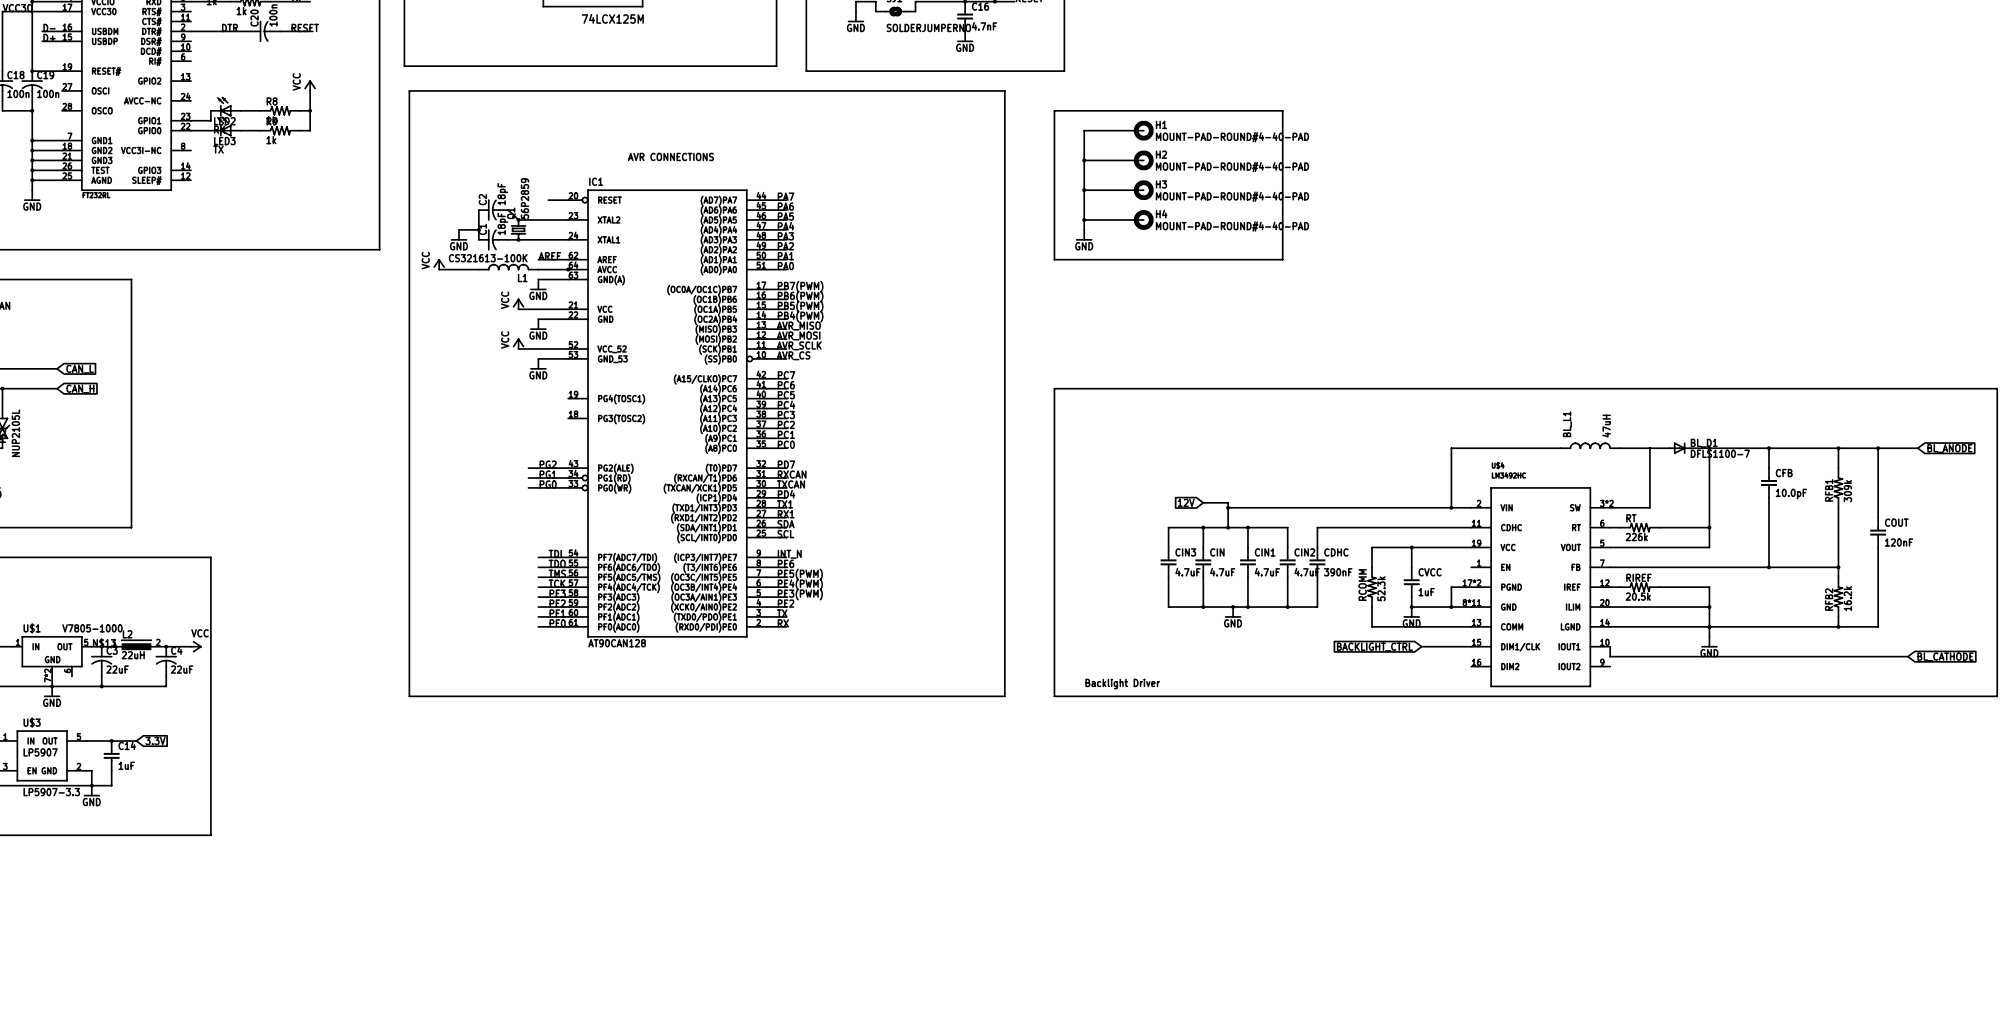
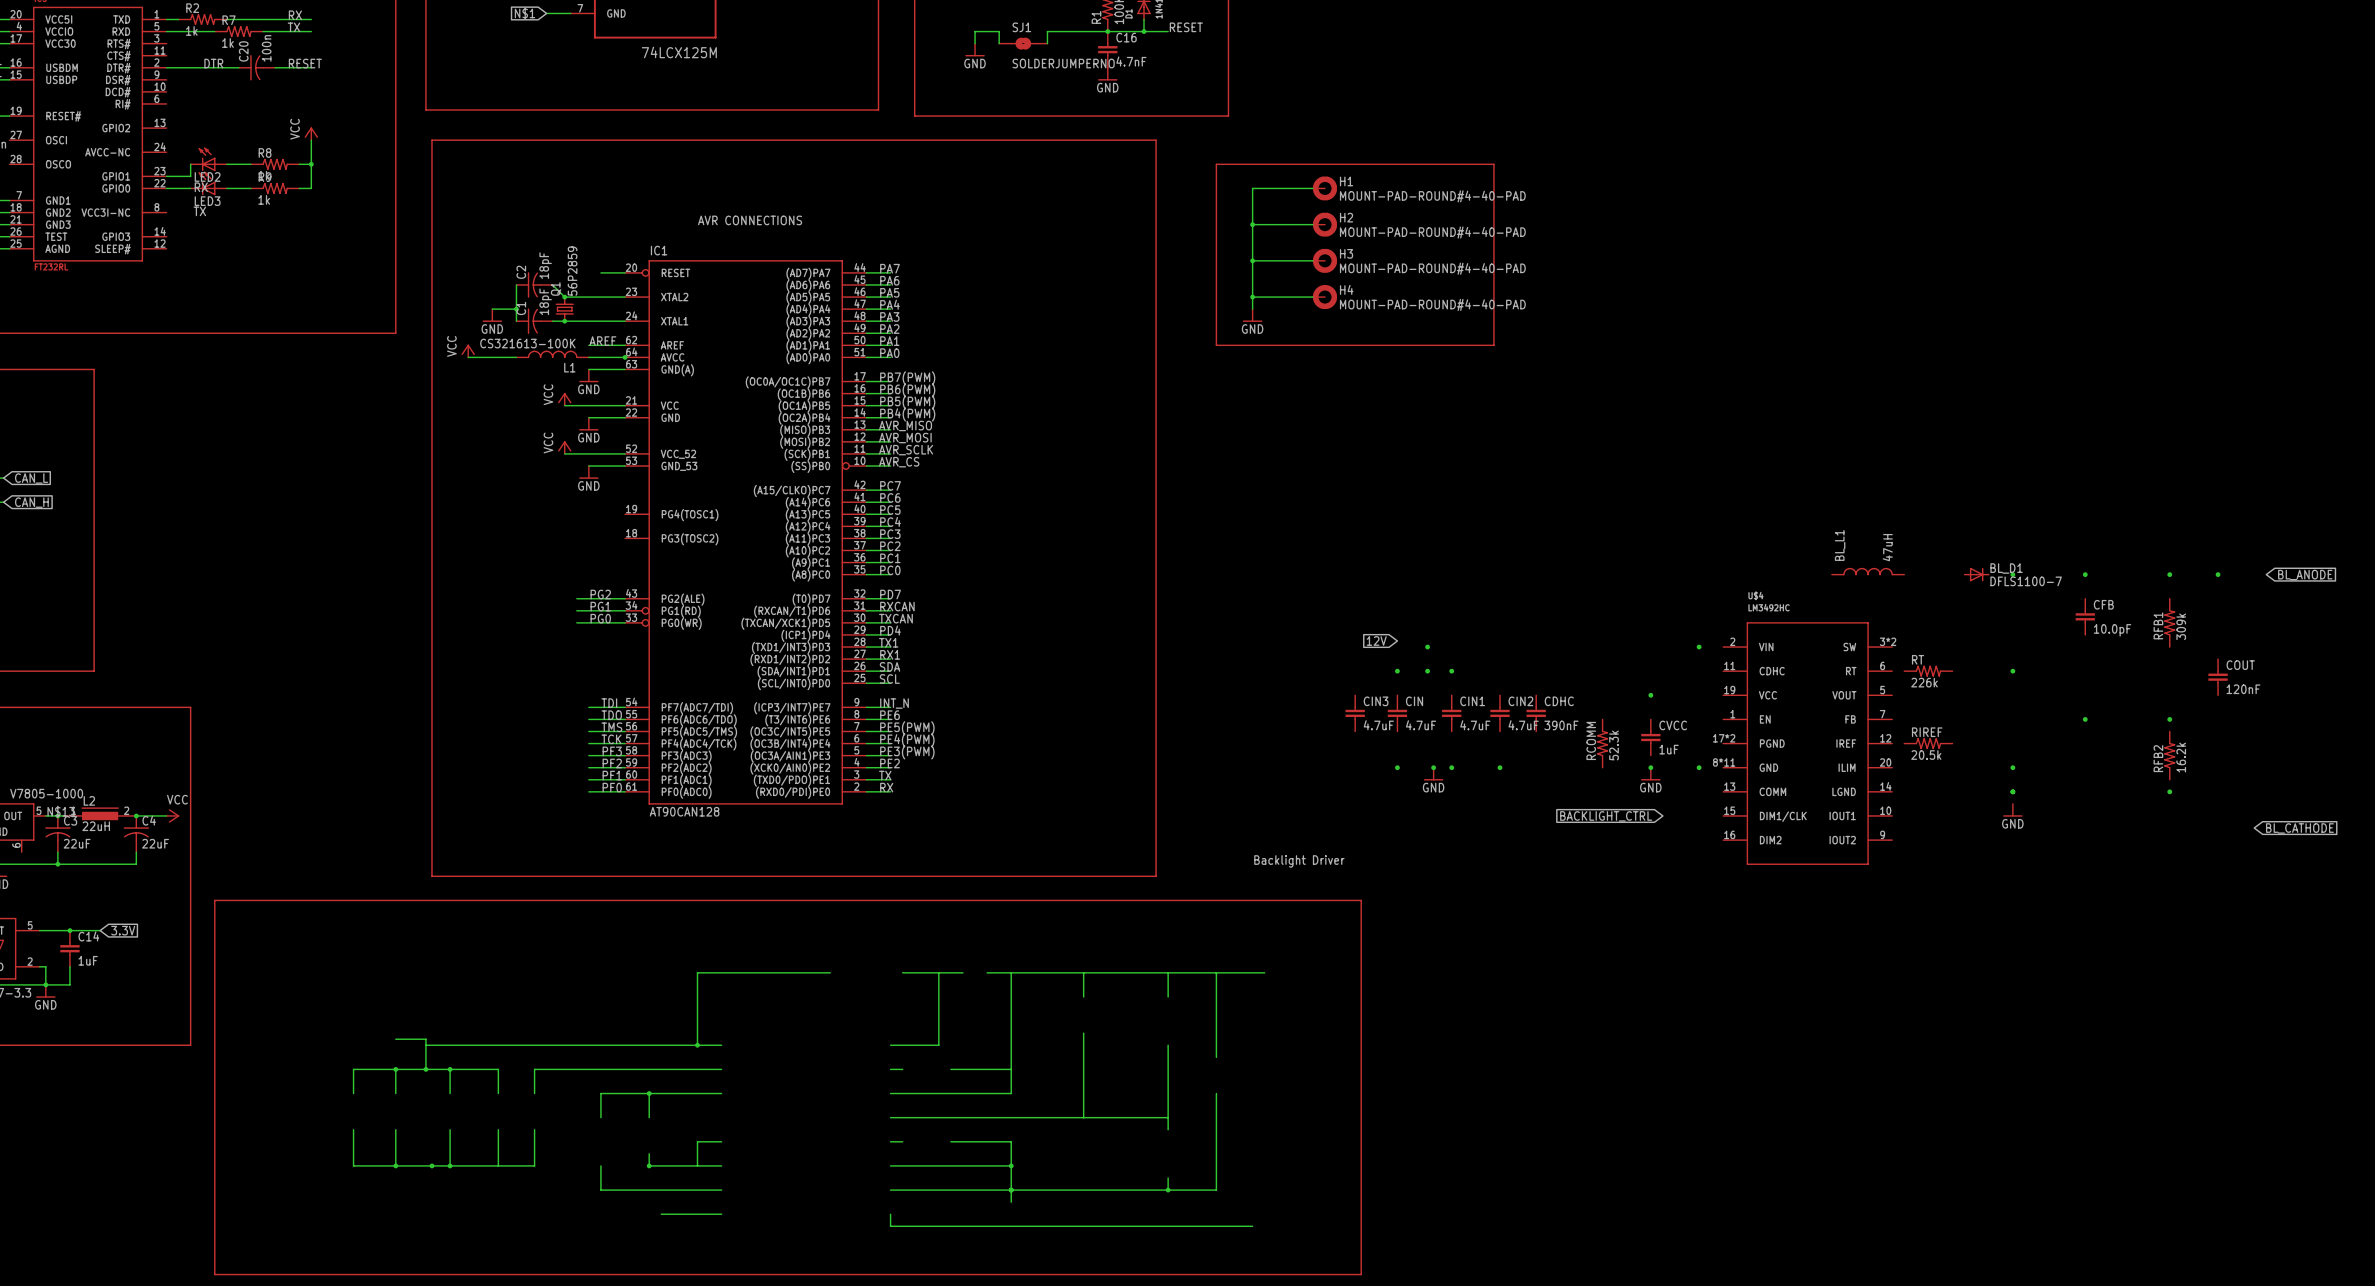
line: (1054, 388) (1997, 388) (1997, 696) (1054, 696) (1054, 388) -> none
wire: (1560, 448) (1451, 448) (1451, 507) -> none
wire: (1620, 448) (1669, 448) -> none
wire: (1649, 448) (1649, 507) (1610, 507) -> none
wire: (1689, 448) (1917, 448) -> none
wire: (1709, 448) (1709, 547) (1610, 547) -> none
wire: (1768, 448) (1768, 468) -> none
wire: (1838, 448) (1838, 468) -> none
wire: (1878, 448) (1878, 517) -> none
wire: (1768, 497) (1768, 567) -> none
wire: (1203, 502) (1228, 502) (1228, 527) -> none
wire: (1228, 507) (1471, 507) -> none
wire: (1838, 507) (1838, 577) -> none
wire: (1203, 527) (1203, 547) -> none
wire: (1247, 527) (1247, 547) -> none
wire: (1471, 527) (1317, 527) (1317, 547) -> none
wire: (1610, 527) (1620, 527) -> none
wire: (1659, 527) (1709, 527) -> none
wire: (1168, 547) (1168, 527) (1287, 527) (1287, 547) -> none
wire: (1411, 547) (1411, 567) -> none
wire: (1471, 547) (1372, 547) (1372, 567) -> none
wire: (1878, 547) (1878, 626) (1610, 626) -> none
wire: (1610, 567) (1838, 567) -> none
wire: (1168, 577) (1168, 607) (1317, 607) (1317, 577) -> none
wire: (1203, 577) (1203, 607) -> none
wire: (1247, 577) (1247, 607) -> none
wire: (1287, 577) (1287, 607) -> none
wire: (1471, 587) (1451, 587) (1451, 607) -> none
wire: (1610, 587) (1620, 587) -> none
wire: (1659, 587) (1709, 587) (1709, 636) -> none
wire: (1411, 597) (1411, 607) (1471, 607) -> none
wire: (1372, 607) (1372, 626) (1471, 626) -> none
wire: (1610, 607) (1709, 607) -> none
wire: (1838, 616) (1838, 626) -> none
wire: (1421, 646) (1471, 646) -> none
wire: (1610, 646) (1610, 656) (1907, 656) -> none
line: none -> (214, 900) (1361, 900) (1361, 1274) (214, 1274) (214, 900)
wire: none -> (830, 972) (697, 972) (697, 1045)
wire: none -> (902, 972) (962, 972)
wire: none -> (938, 972) (938, 1045) (890, 1045)
wire: none -> (987, 972) (1264, 972)
wire: none -> (1011, 972) (1011, 1093) (890, 1093)
wire: none -> (1083, 972) (1083, 996)
wire: none -> (1168, 972) (1168, 996)
wire: none -> (1216, 972) (1216, 1057)
wire: none -> (1083, 1033) (1083, 1117)
wire: none -> (395, 1039) (425, 1039) (425, 1069)
wire: none -> (425, 1045) (721, 1045)
junction: none -> (697, 1045)
wire: none -> (1168, 1045) (1168, 1129)
wire: none -> (395, 1069) (395, 1093)
junction: none -> (395, 1069)
junction: none -> (425, 1069)
wire: none -> (450, 1069) (450, 1093)
junction: none -> (450, 1069)
wire: none -> (721, 1069) (534, 1069) (534, 1093)
wire: none -> (890, 1069) (902, 1069)
wire: none -> (950, 1069) (1011, 1069)
wire: none -> (353, 1093) (353, 1069) (498, 1069) (498, 1093)
wire: none -> (649, 1093) (649, 1117)
junction: none -> (649, 1093)
wire: none -> (721, 1093) (600, 1093) (600, 1117)
wire: none -> (1216, 1093) (1216, 1190) (890, 1190)
wire: none -> (890, 1117) (1168, 1117)
wire: none -> (353, 1129) (353, 1165) (534, 1165) (534, 1129)
wire: none -> (395, 1129) (395, 1165)
wire: none -> (450, 1129) (450, 1165)
wire: none -> (498, 1129) (498, 1165)
wire: none -> (721, 1141) (697, 1141) (697, 1165)
wire: none -> (890, 1141) (902, 1141)
wire: none -> (950, 1141) (1011, 1141) (1011, 1202)
wire: none -> (649, 1153) (649, 1165) (721, 1165)
junction: none -> (395, 1165)
junction: none -> (431, 1165)
junction: none -> (450, 1165)
wire: none -> (600, 1165) (600, 1190) (721, 1190)
junction: none -> (649, 1165)
wire: none -> (890, 1165) (1011, 1165)
junction: none -> (1011, 1165)
wire: none -> (1168, 1178) (1168, 1190)
junction: none -> (1011, 1190)
junction: none -> (1168, 1190)
wire: none -> (661, 1214) (721, 1214)
wire: none -> (890, 1214) (890, 1226) (1252, 1226)

